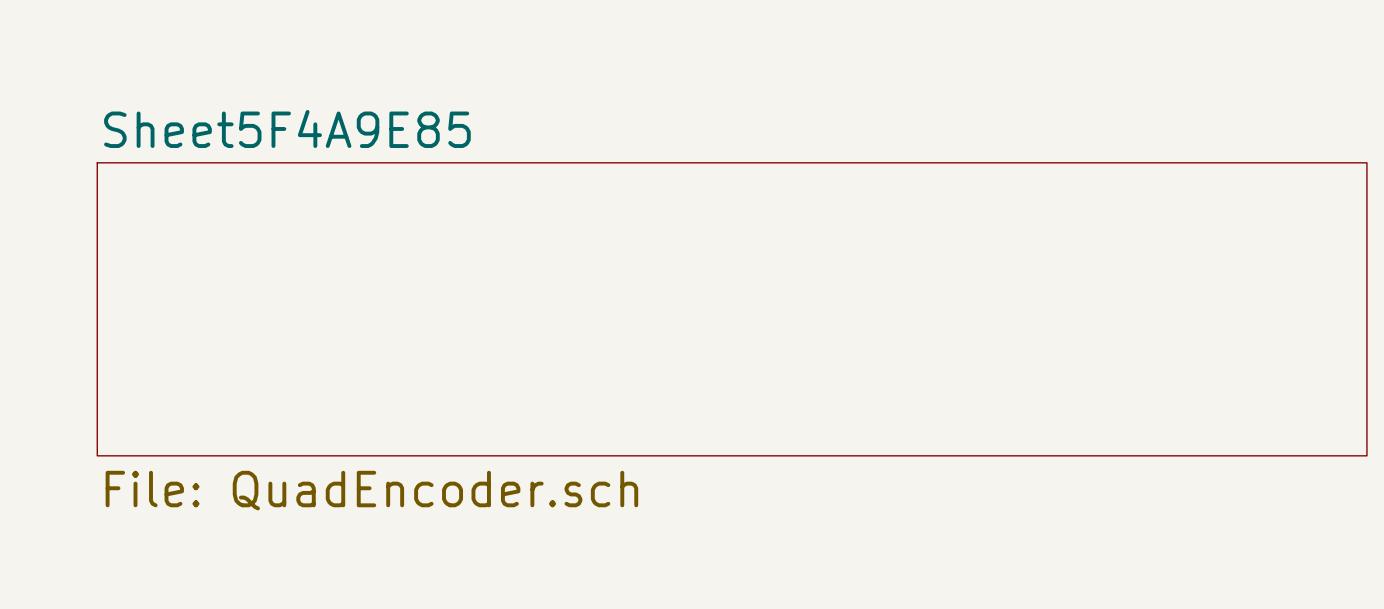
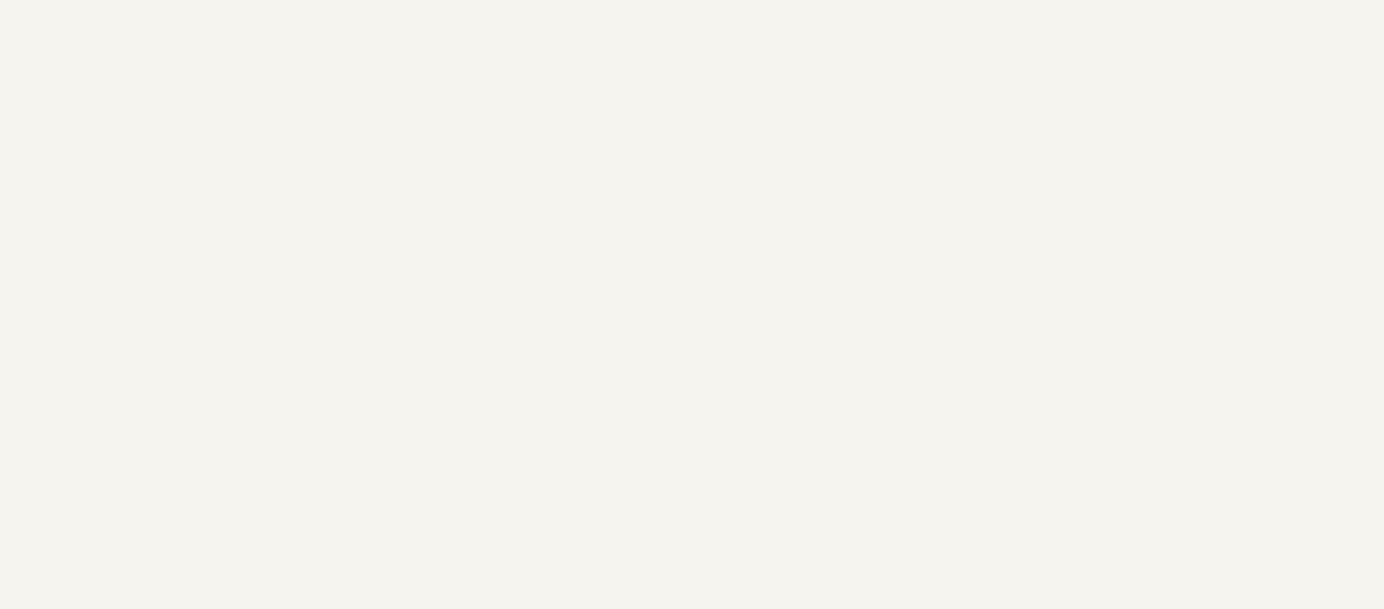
sheet Sheet5F4A9E85: File: QuadEncoder.sch (732, 309) -> none

